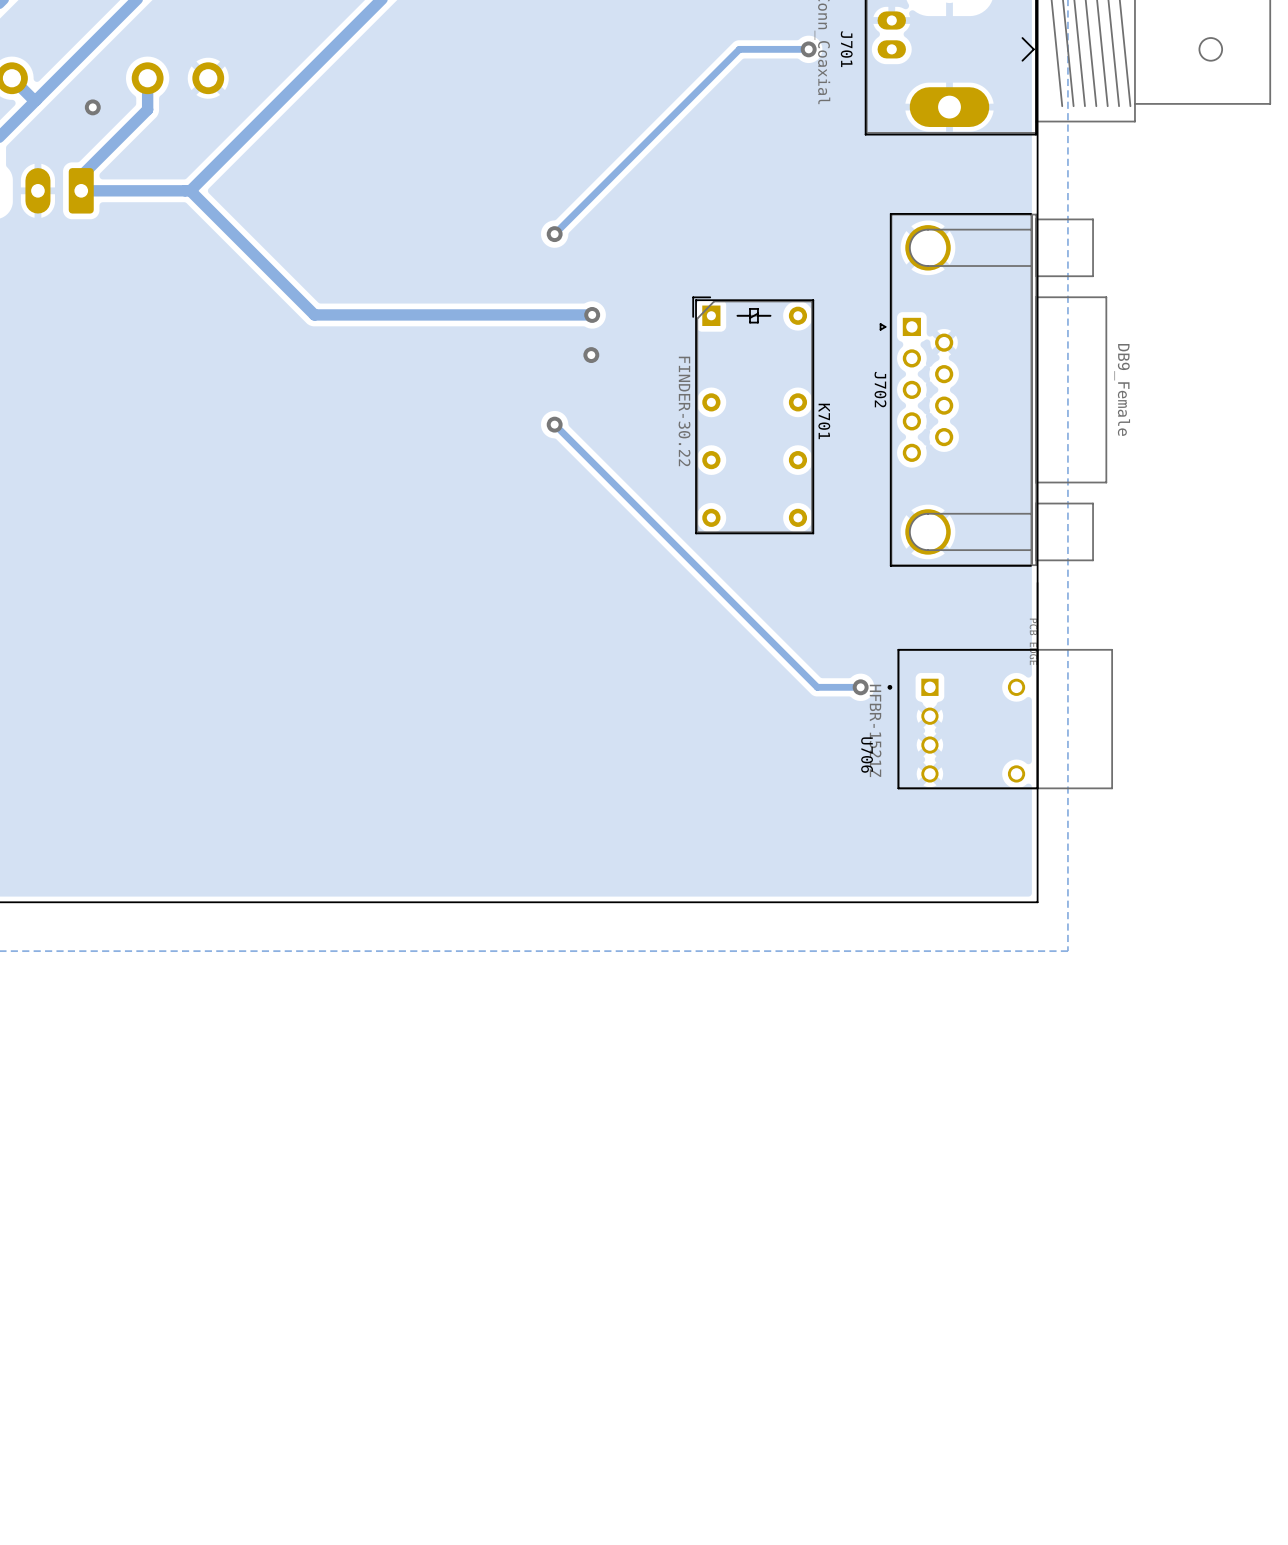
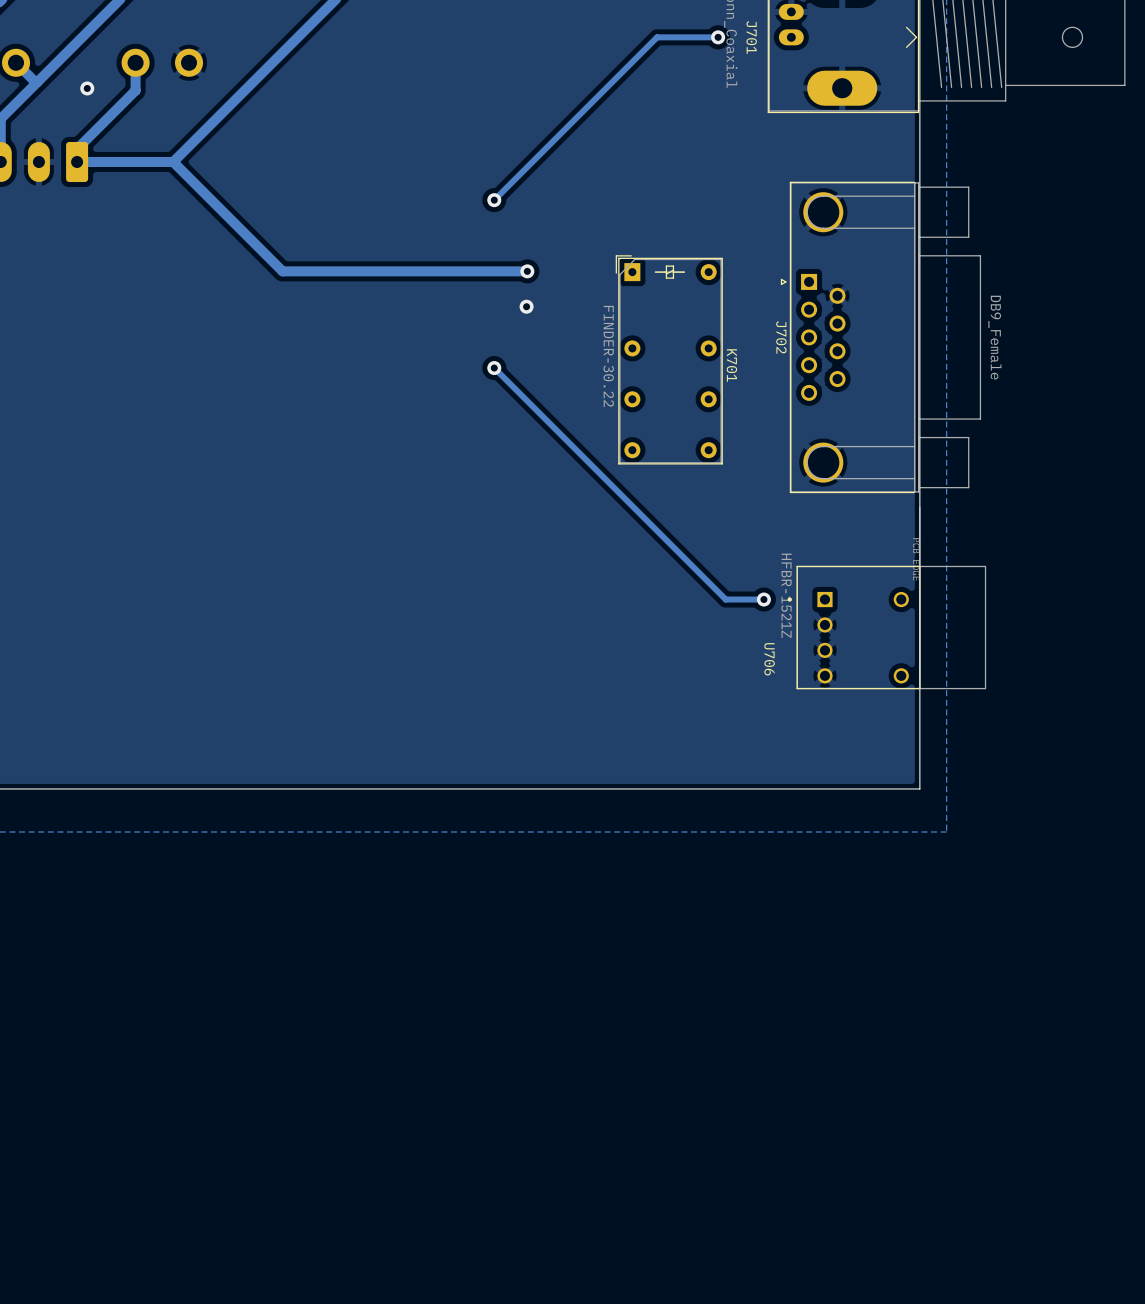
U706 value position: HFBR-1521Z (875, 730) -> HFBR-1521Z (786, 595)

